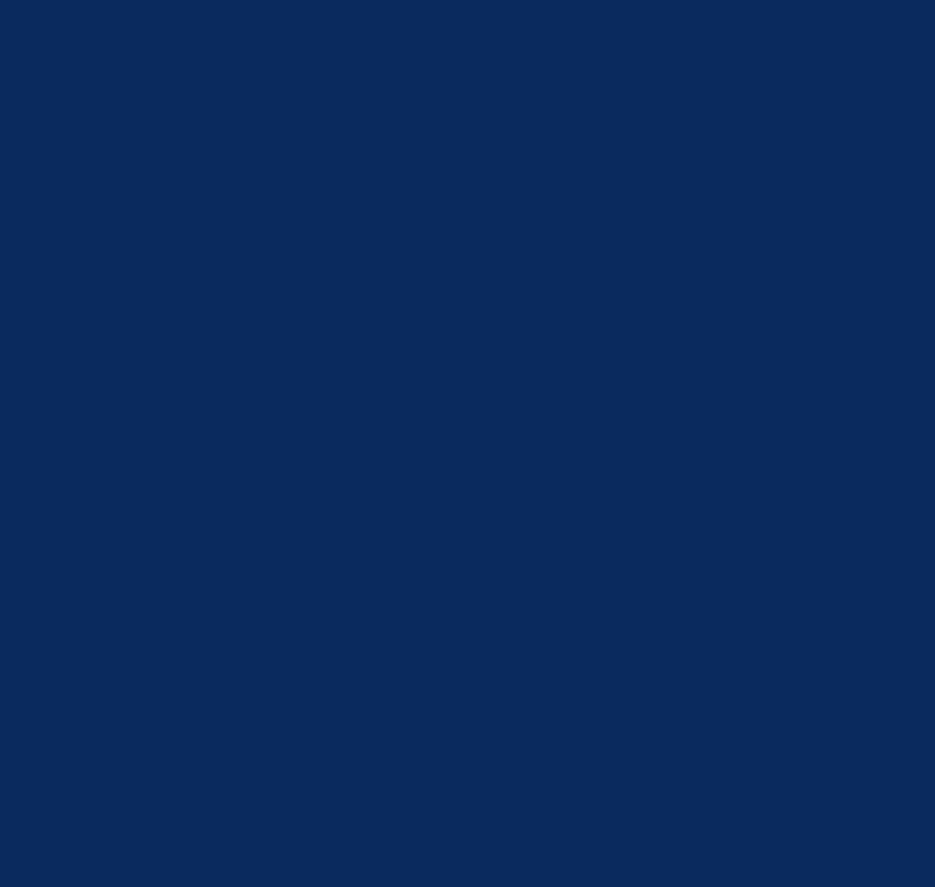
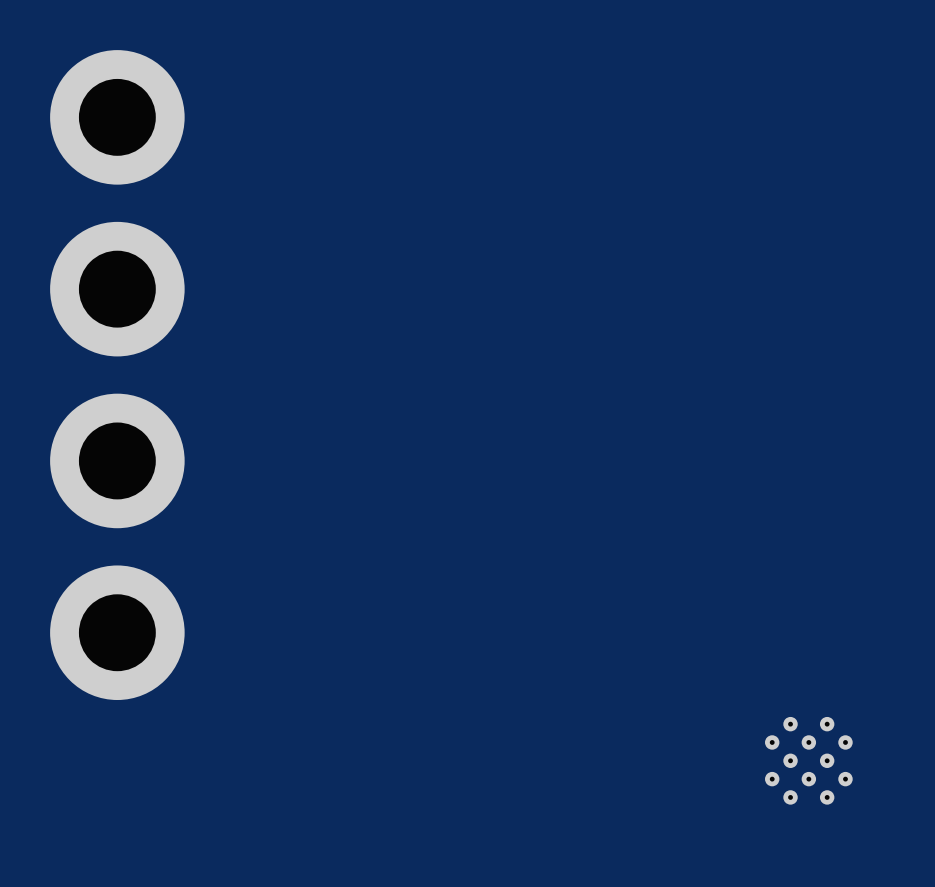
part: none -> (117, 117)
part: none -> (117, 289)
part: none -> (117, 460)
part: none -> (117, 632)
part: none -> (808, 760)

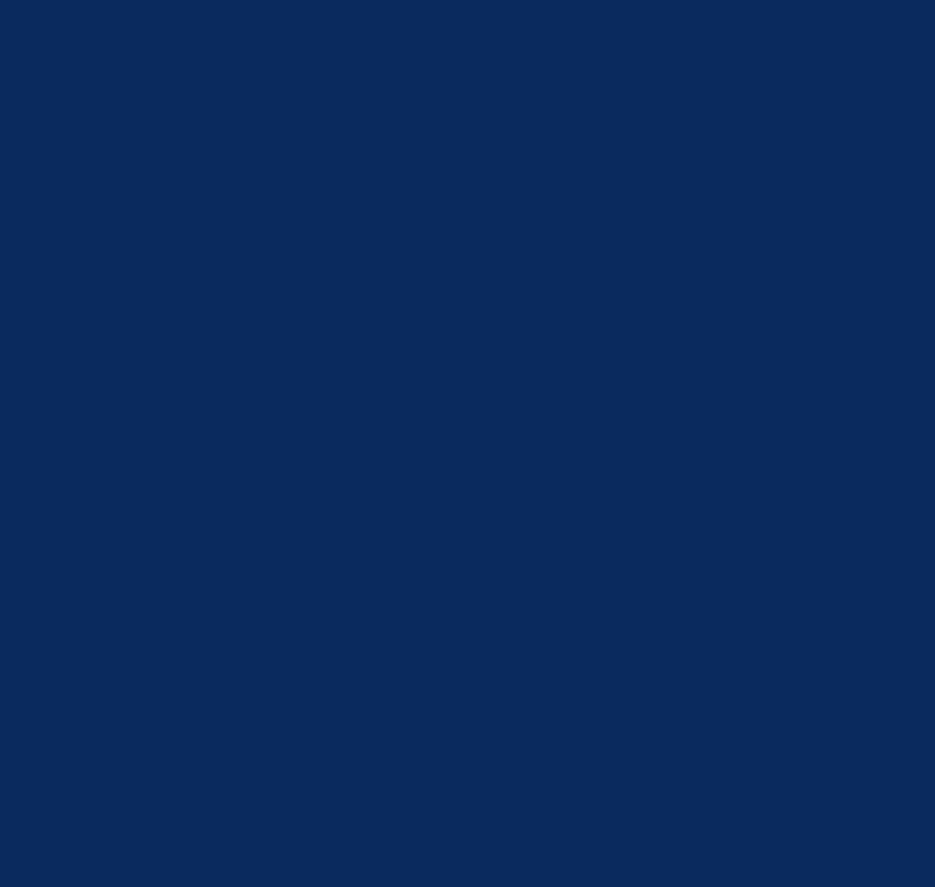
part: (117, 117) -> none
part: (117, 289) -> none
part: (117, 460) -> none
part: (117, 632) -> none
part: (808, 760) -> none

